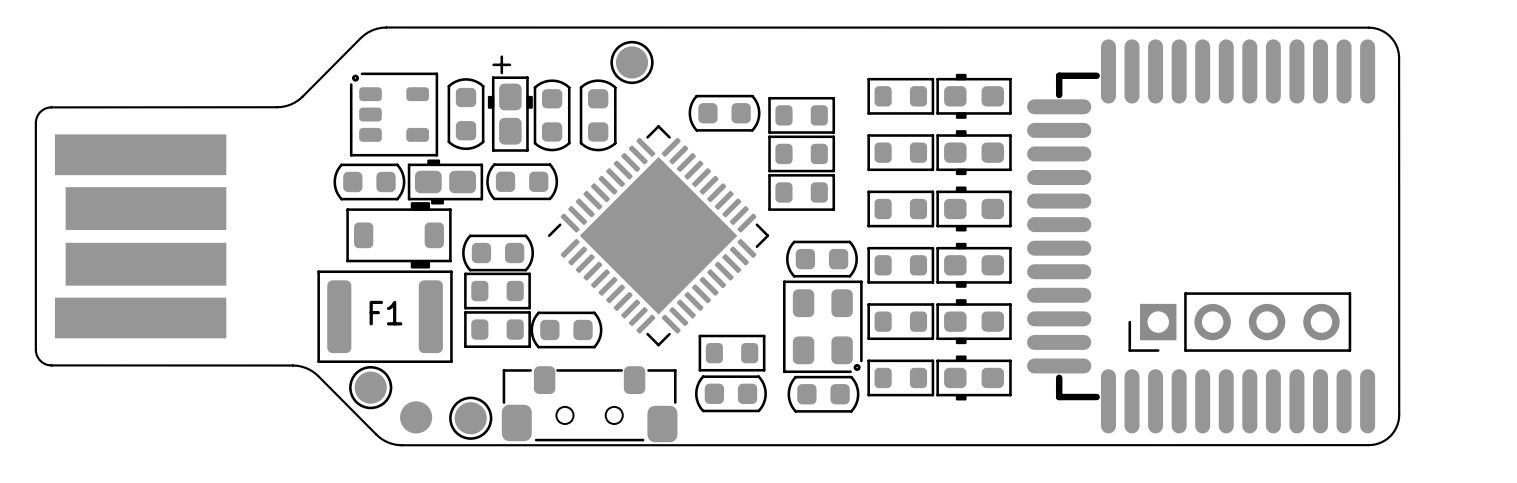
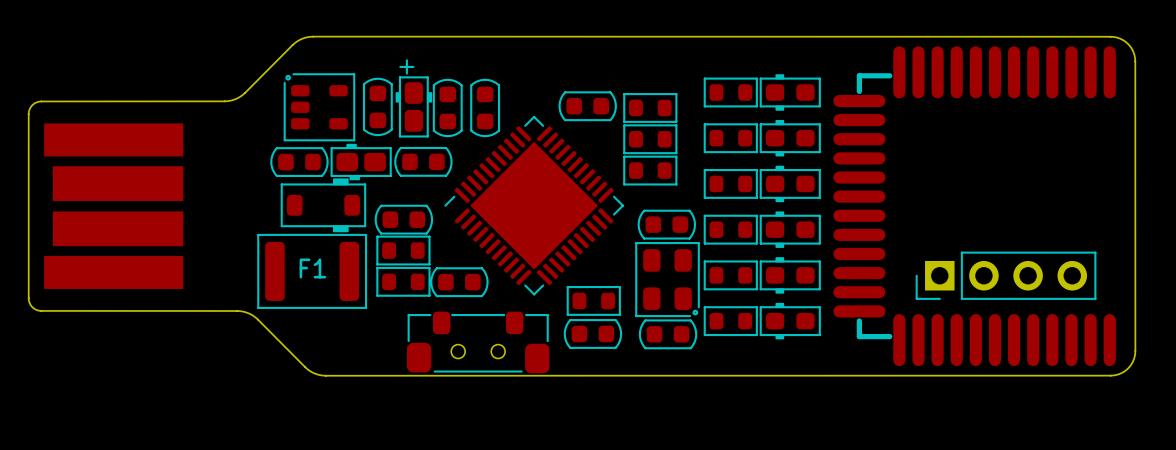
part: (632, 62) -> none
part: (370, 387) -> none
part: (416, 417) -> none
part: (470, 418) -> none

